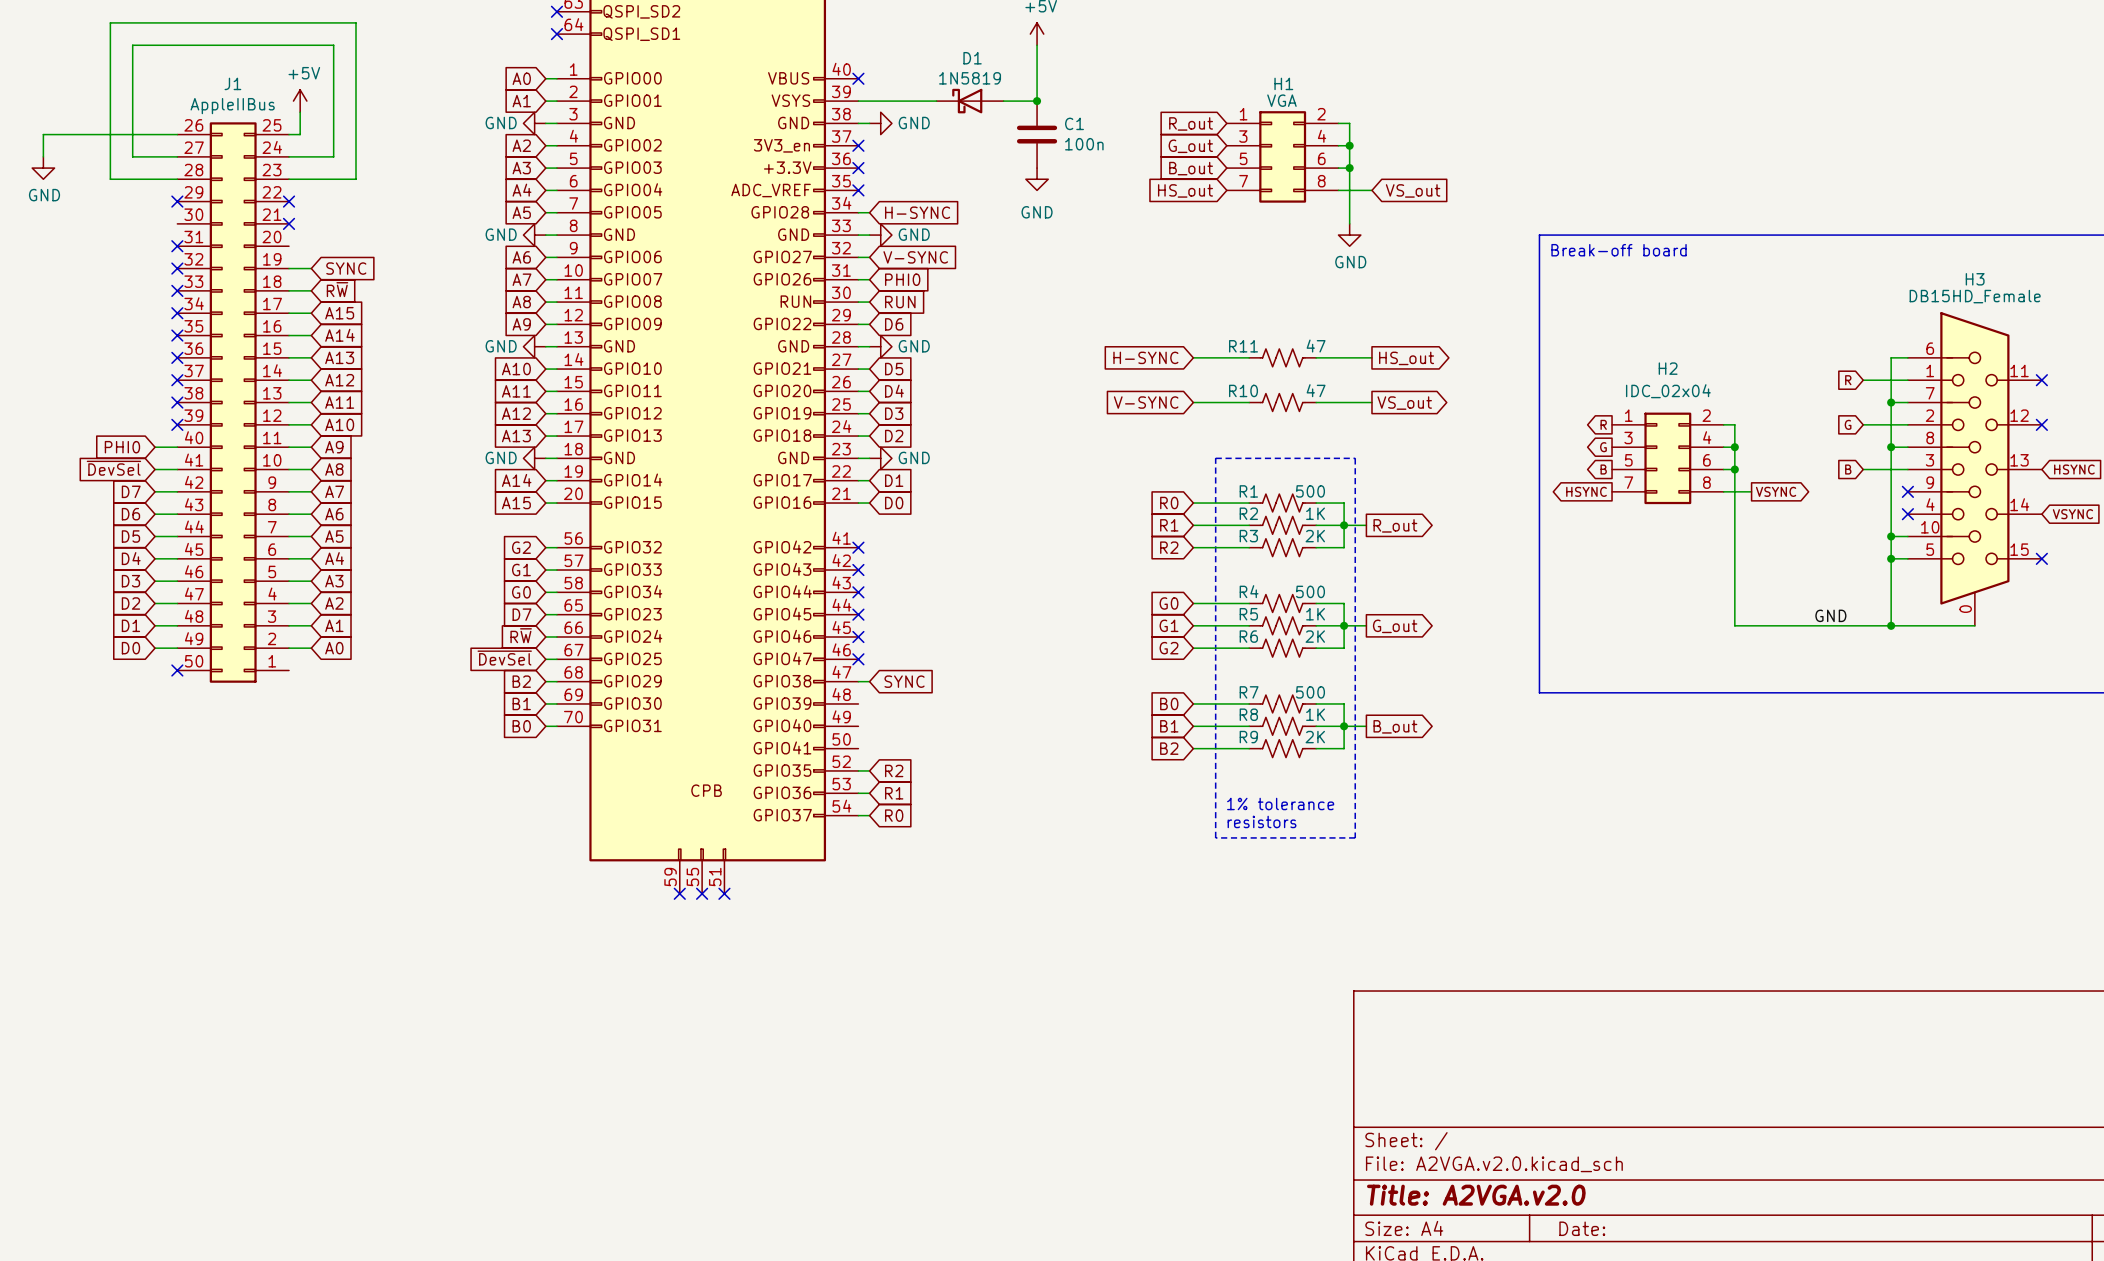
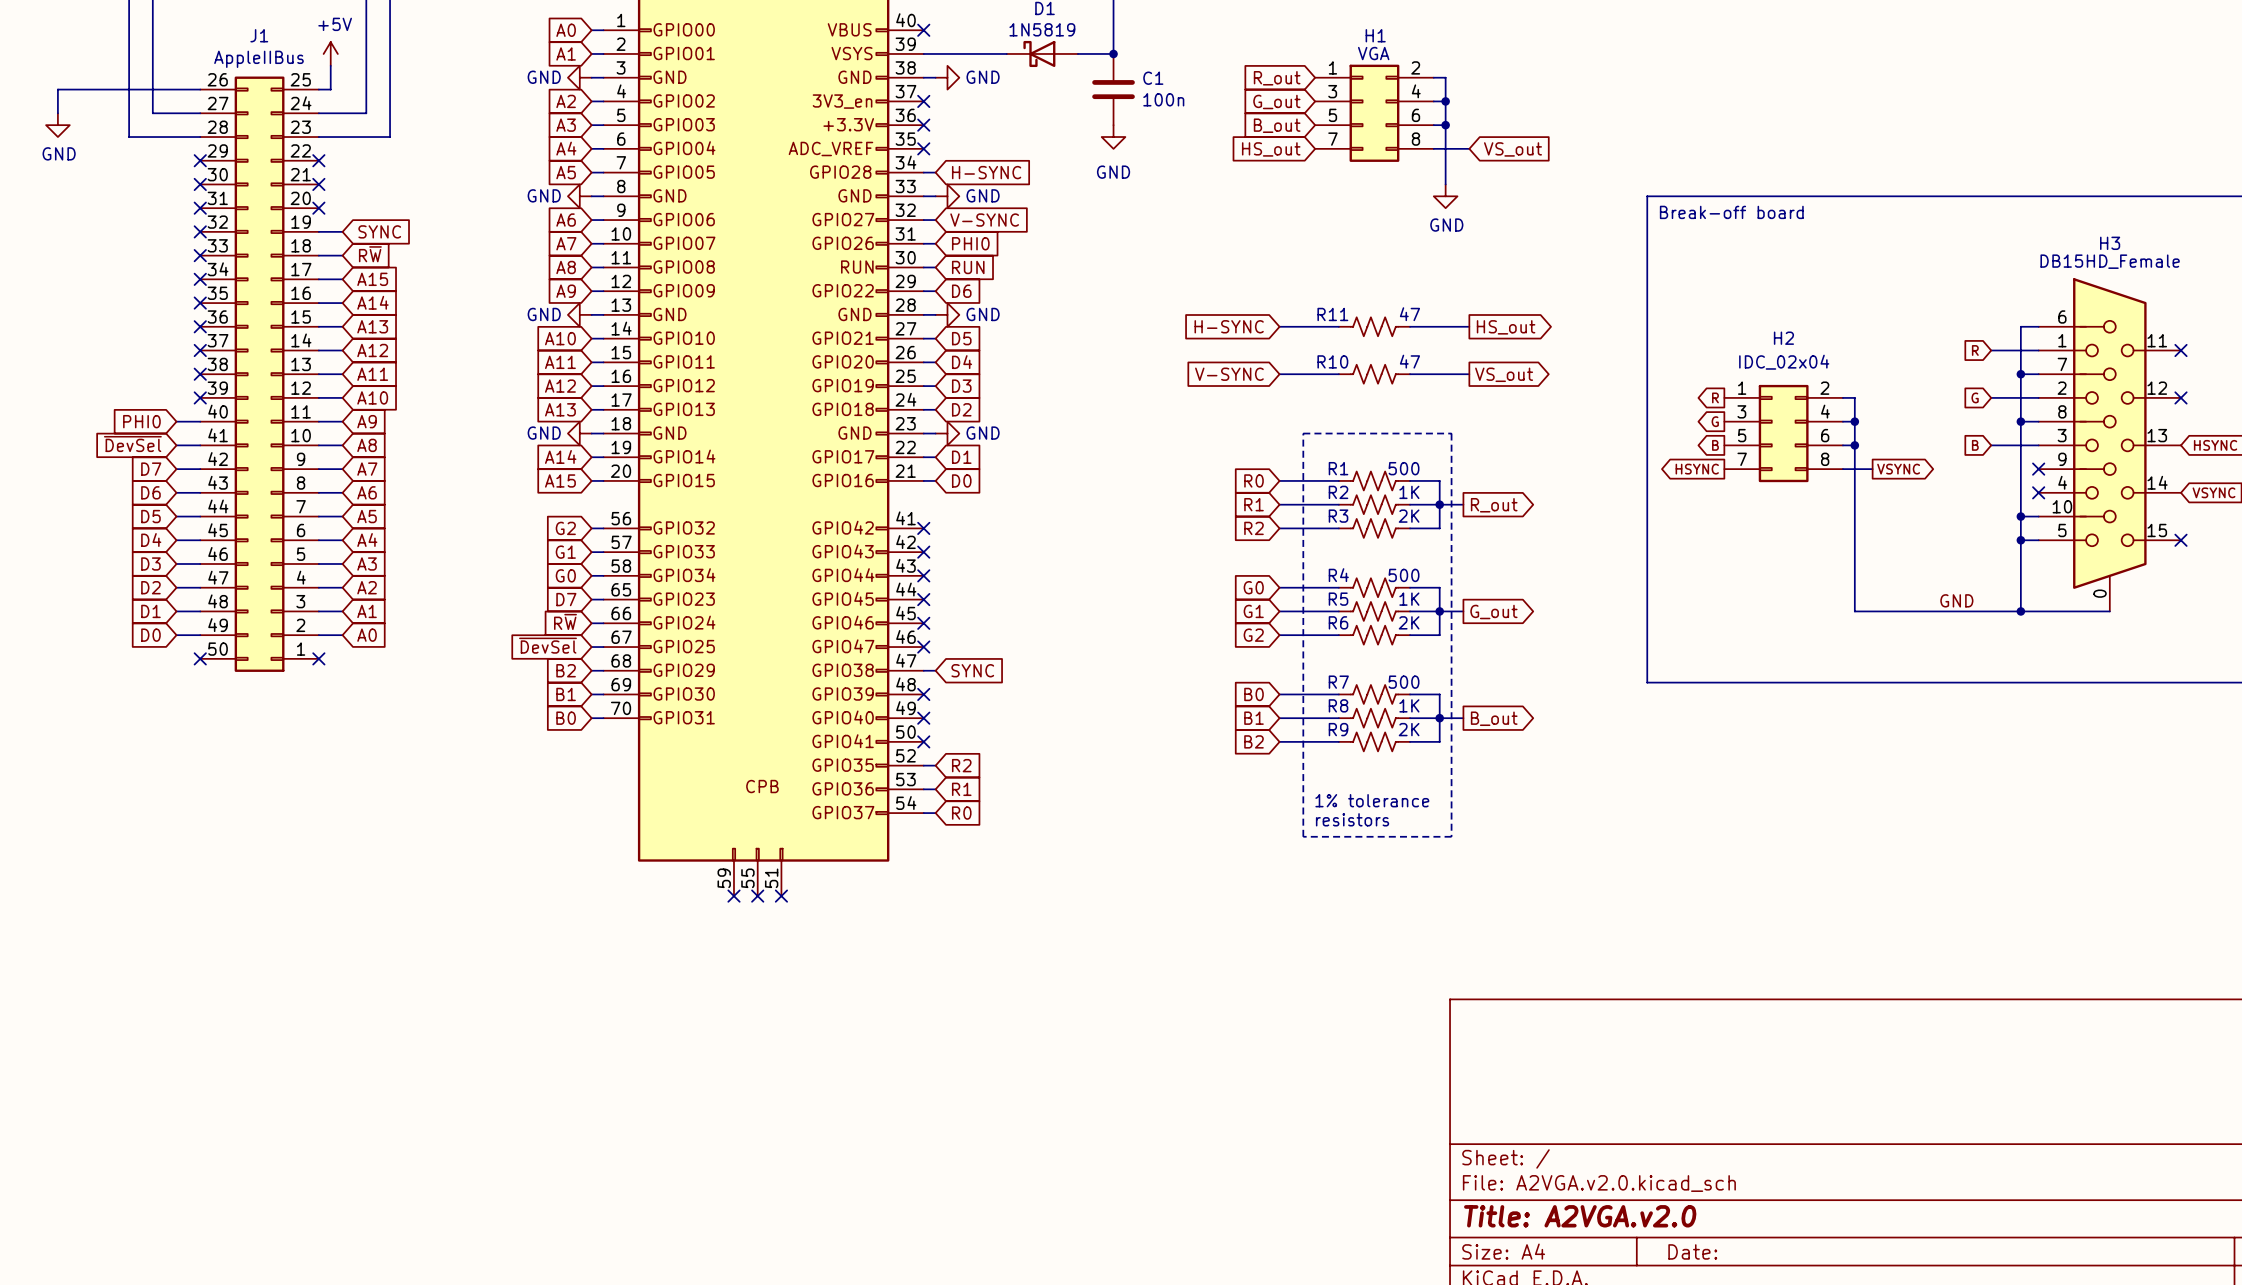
no-connect mark: none -> (200, 184)
no-connect mark: none -> (318, 208)
no-connect mark: none -> (318, 658)
no-connect mark: none -> (923, 694)
no-connect mark: none -> (923, 718)
no-connect mark: none -> (923, 741)

